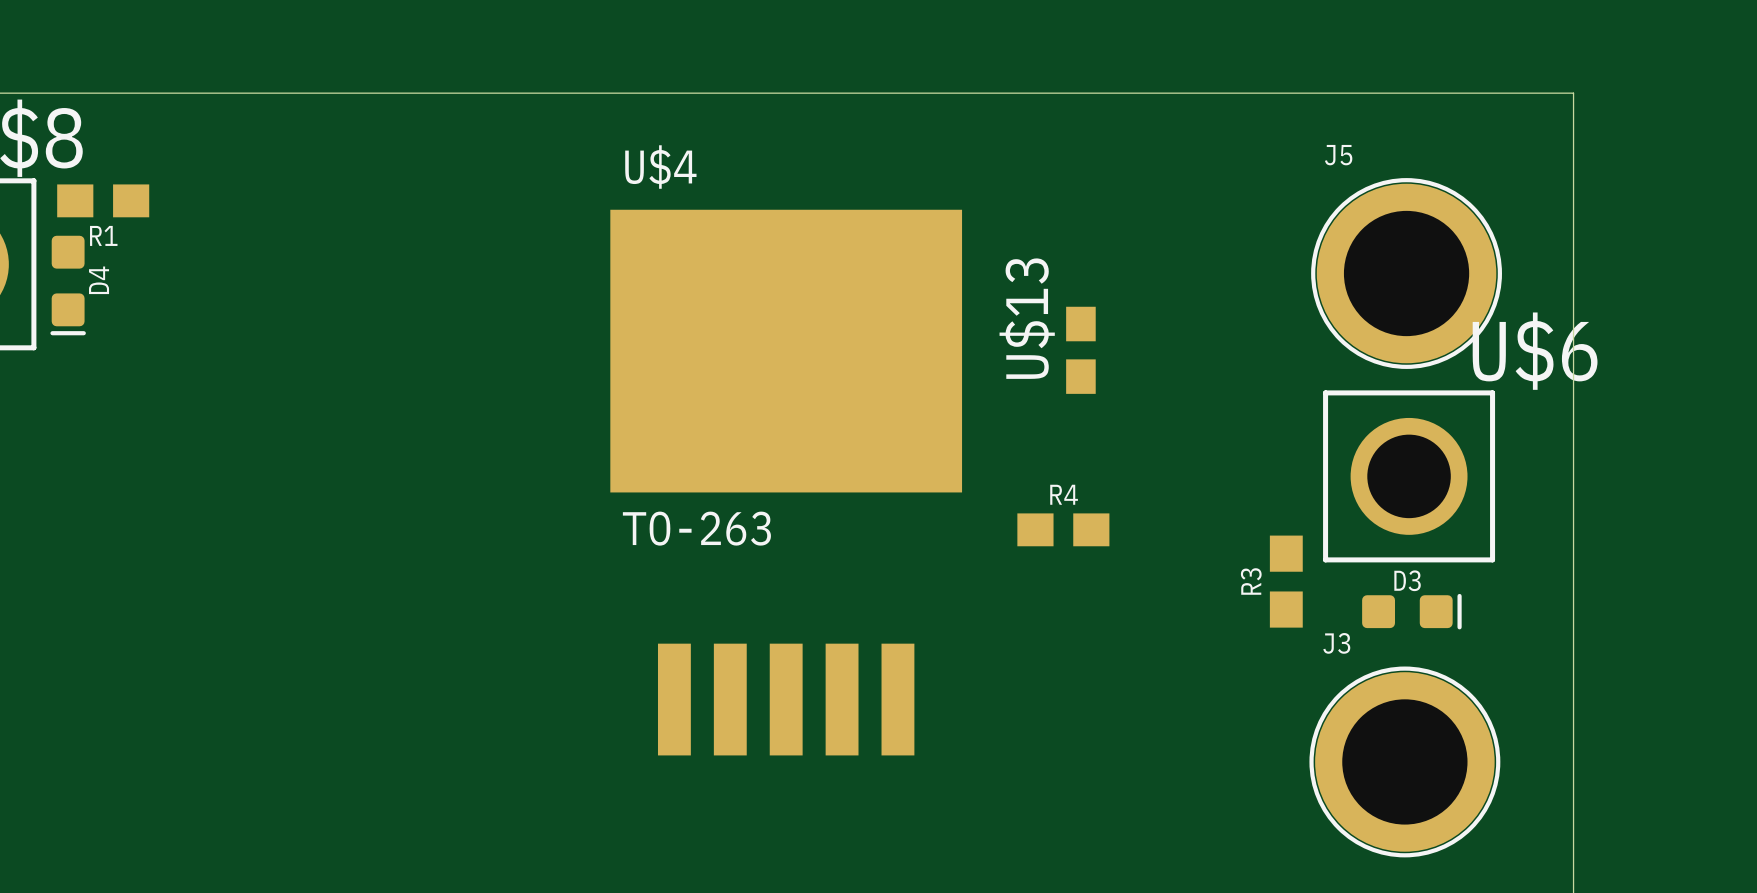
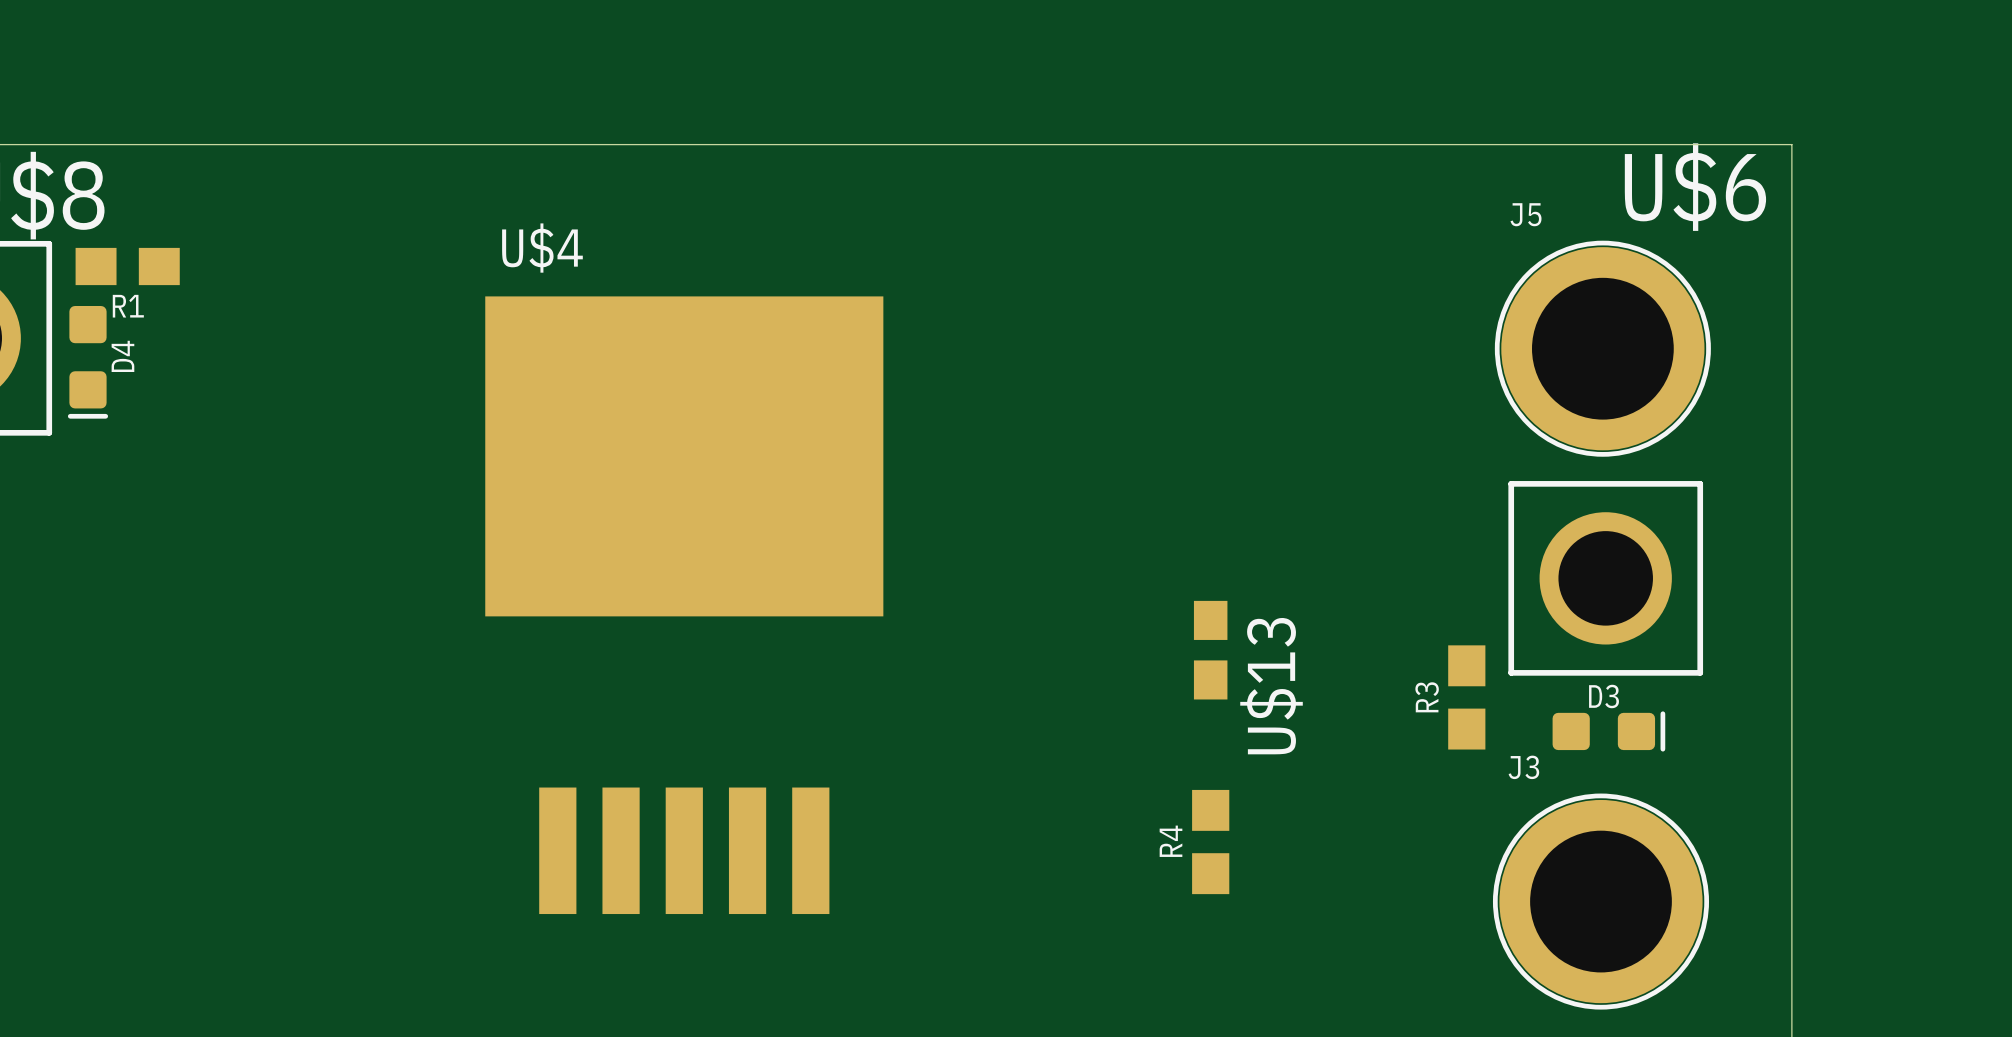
U$13 name position: U$13 (1027, 318) -> U$13 (1271, 686)
U$13 position: (1080, 350) -> (1210, 650)
U$6 name position: U$6 (1535, 351) -> U$6 (1695, 187)
U$4 position: (786, 482) -> (684, 605)
U$4 value: TO-263 (696, 528) -> none
R4 rotation: 0° (1063, 529) -> 90° clockwise (1210, 842)
R4 position: (1063, 529) -> (1210, 842)

